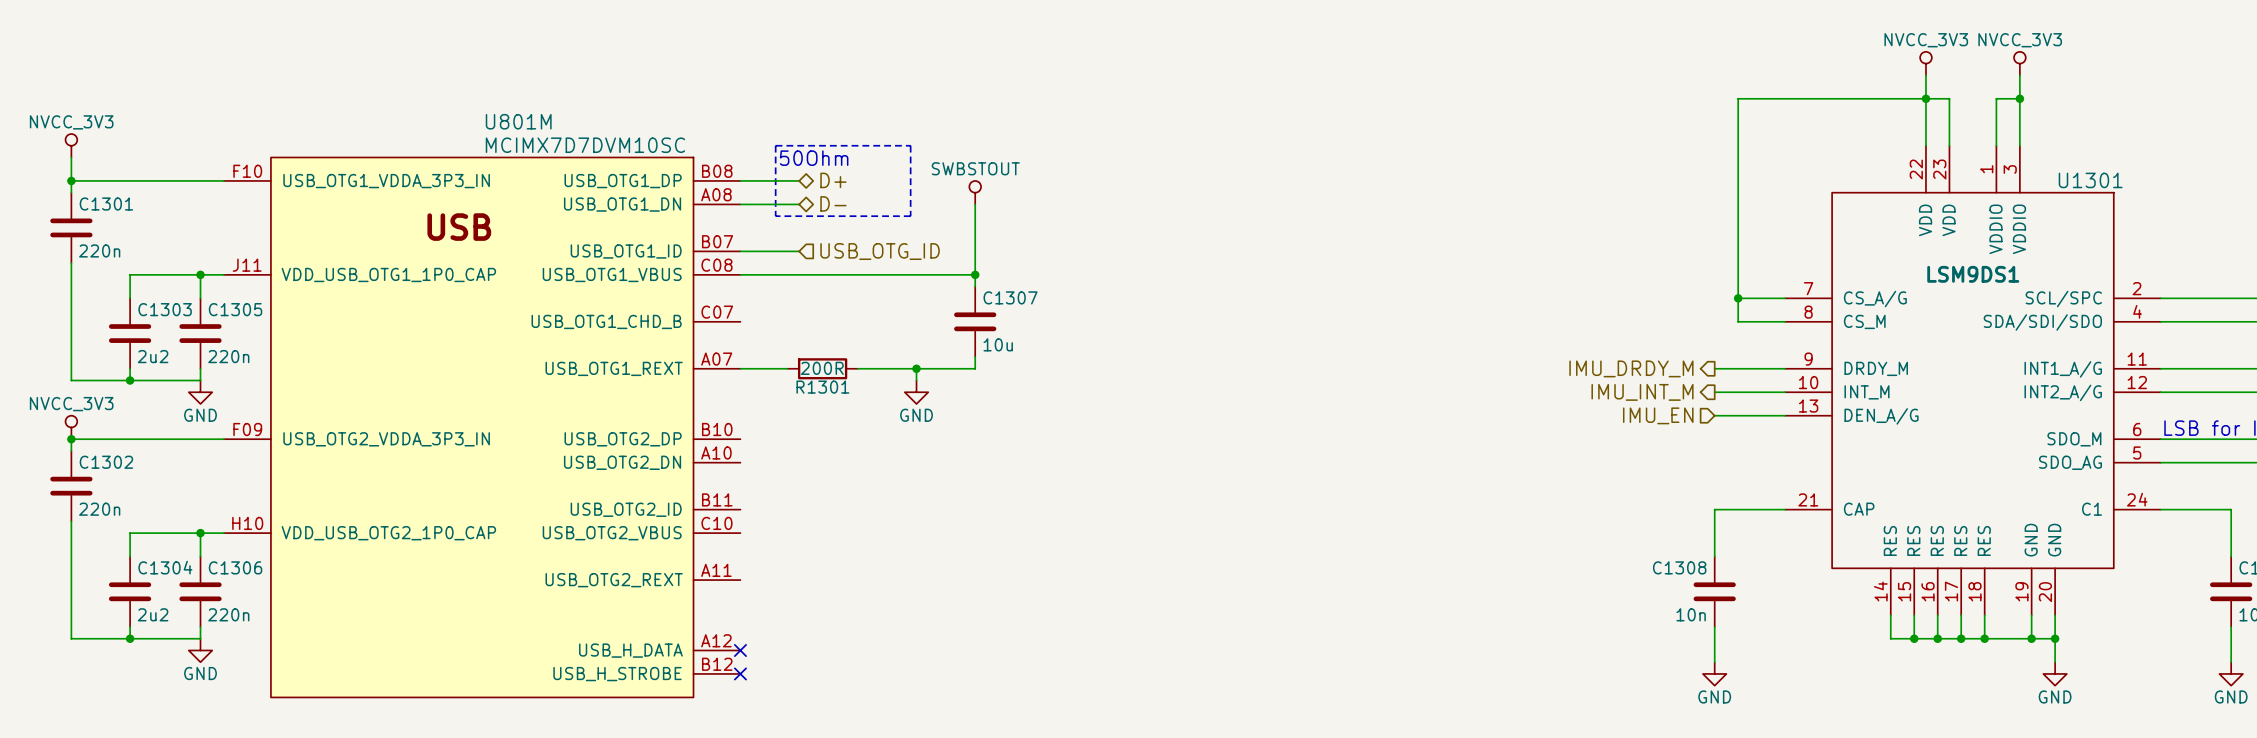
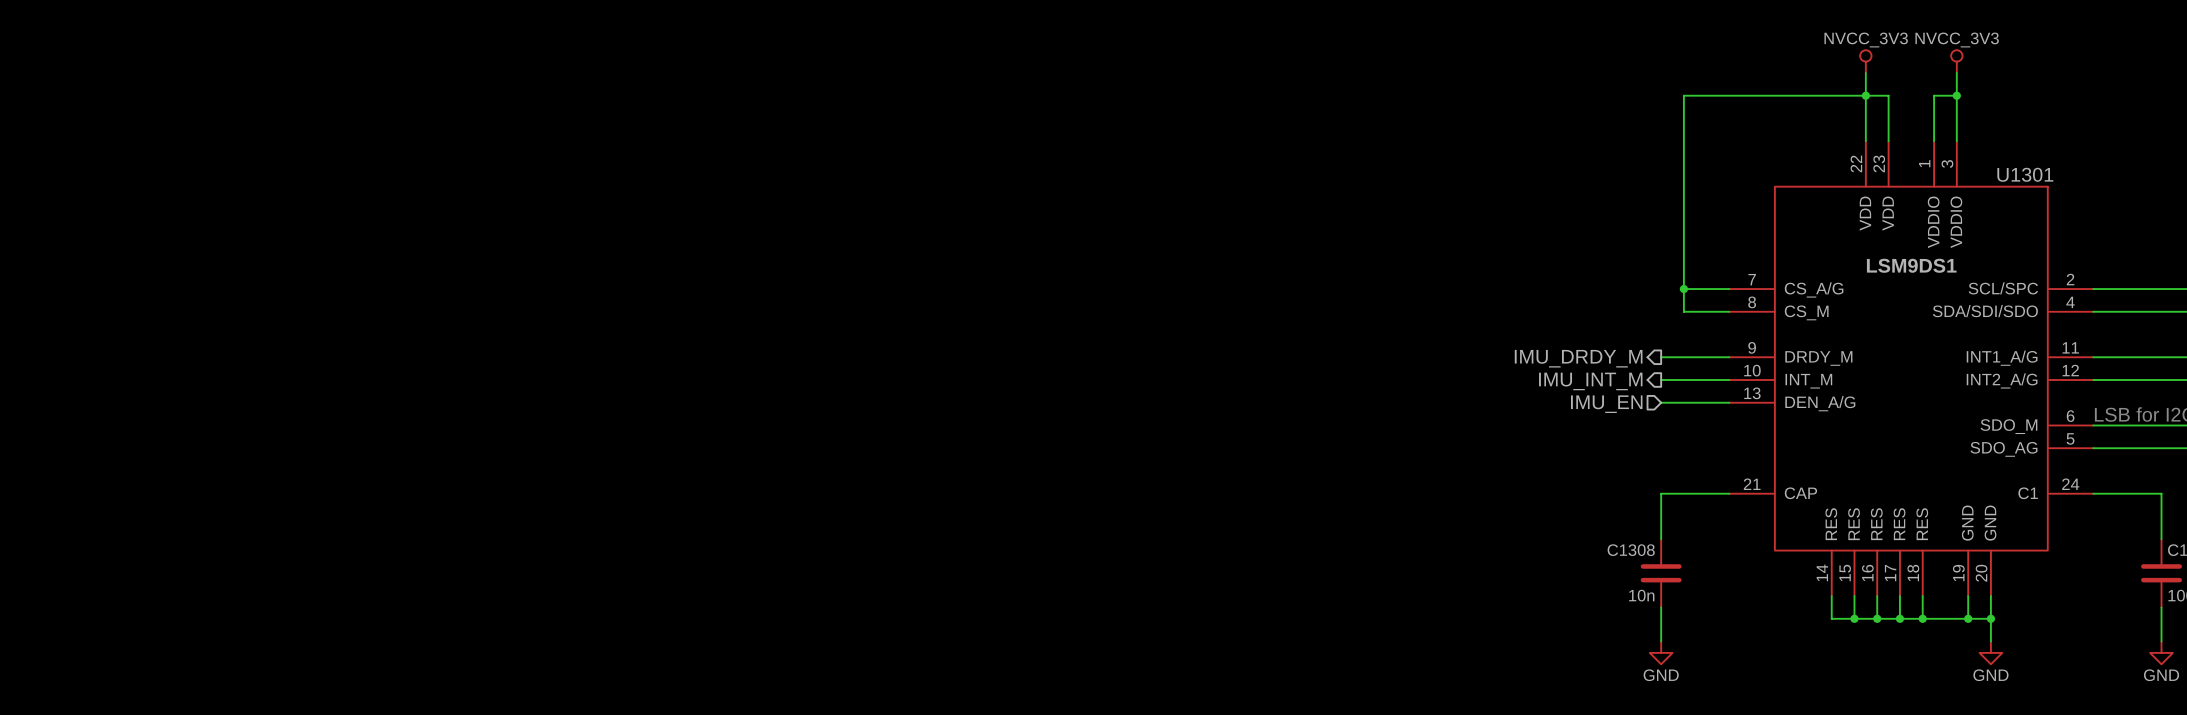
power symbol: NVCC_3V3 (71, 145) -> none
line: (775, 145) (775, 216) (910, 216) (910, 145) (775, 145) -> none
wire: (71, 157) (71, 192) -> none
text: 50Ohm (814, 158) -> none
wire: (71, 180) (223, 180) -> none
junction: (71, 180) -> none
wire: (740, 180) (799, 180) -> none
hierarchical label: D+ (833, 180) -> none
power symbol: SWBSTOUT (975, 192) -> none
hierarchical label: D- (833, 203) -> none
wire: (740, 204) (799, 204) -> none
wire: (975, 204) (975, 286) -> none
C1301: 220n (71, 227) -> none
wire: (740, 251) (799, 251) -> none
hierarchical label: USB_OTG_ID (880, 251) -> none
wire: (71, 263) (71, 380) (200, 380) (200, 368) -> none
wire: (200, 274) (200, 298) -> none
junction: (200, 274) -> none
wire: (223, 274) (130, 274) (130, 298) -> none
wire: (740, 274) (975, 274) -> none
junction: (975, 274) -> none
C1307: 10u (975, 321) -> none
C1303: 2u2 (130, 333) -> none
C1305: 220n (200, 333) -> none
wire: (975, 357) (975, 368) (857, 368) -> none
wire: (130, 368) (130, 380) -> none
wire: (740, 368) (787, 368) -> none
R1301: 200R (822, 368) -> none
wire: (916, 368) (916, 380) -> none
junction: (916, 368) -> none
junction: (130, 380) -> none
power symbol: GND (200, 392) -> none
power symbol: GND (916, 392) -> none
power symbol: NVCC_3V3 (71, 427) -> none
U801M: MCIMX7D7DVM10SC (482, 427) -> none
junction: (71, 439) -> none
wire: (223, 439) (71, 439) (71, 450) -> none
C1302: 220n (71, 486) -> none
wire: (71, 521) (71, 638) (200, 638) (200, 627) -> none
wire: (200, 533) (200, 556) -> none
junction: (200, 533) -> none
wire: (223, 533) (130, 533) (130, 556) -> none
C1304: 2u2 (130, 591) -> none
C1306: 220n (200, 591) -> none
wire: (130, 627) (130, 638) -> none
junction: (130, 638) -> none
power symbol: GND (200, 650) -> none
no-connect mark: (740, 650) -> none
no-connect mark: (740, 673) -> none

